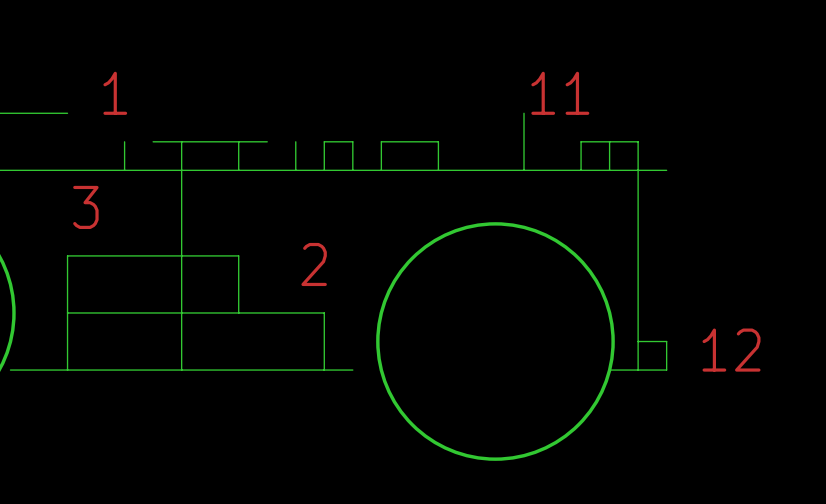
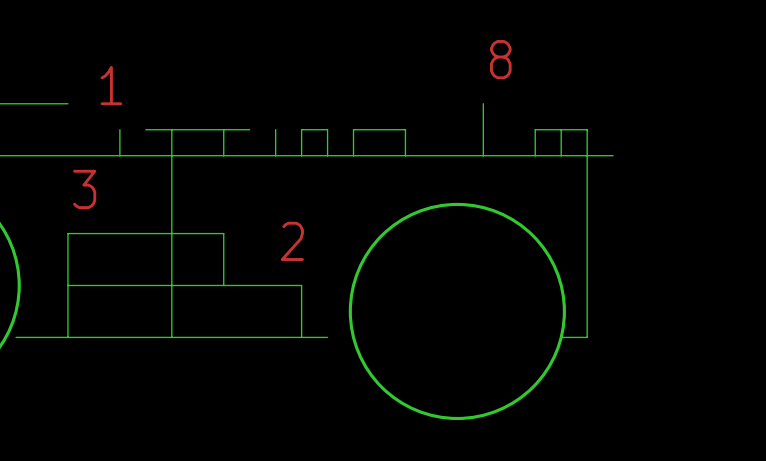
text: none -> 8 (500, 59)
text: 11 (560, 93) -> none
wire: (638, 341) (666, 341) (666, 370) (638, 370) -> none
text: 12 (731, 350) -> none

